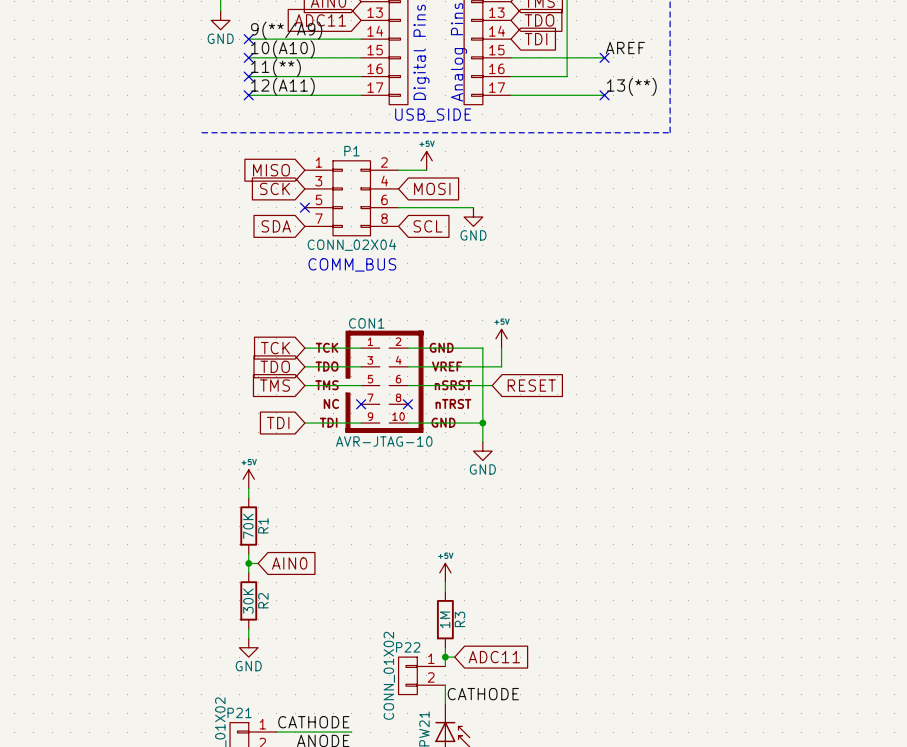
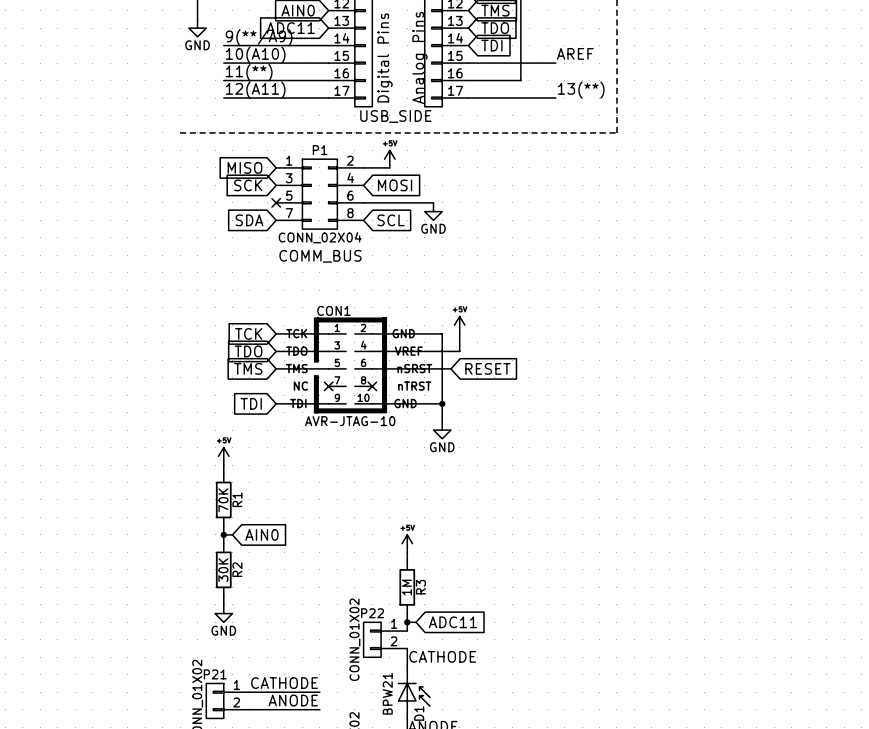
no-connect mark: (248, 39) -> none
no-connect mark: (248, 57) -> none
no-connect mark: (604, 57) -> none
no-connect mark: (248, 76) -> none
no-connect mark: (248, 95) -> none
no-connect mark: (604, 95) -> none

